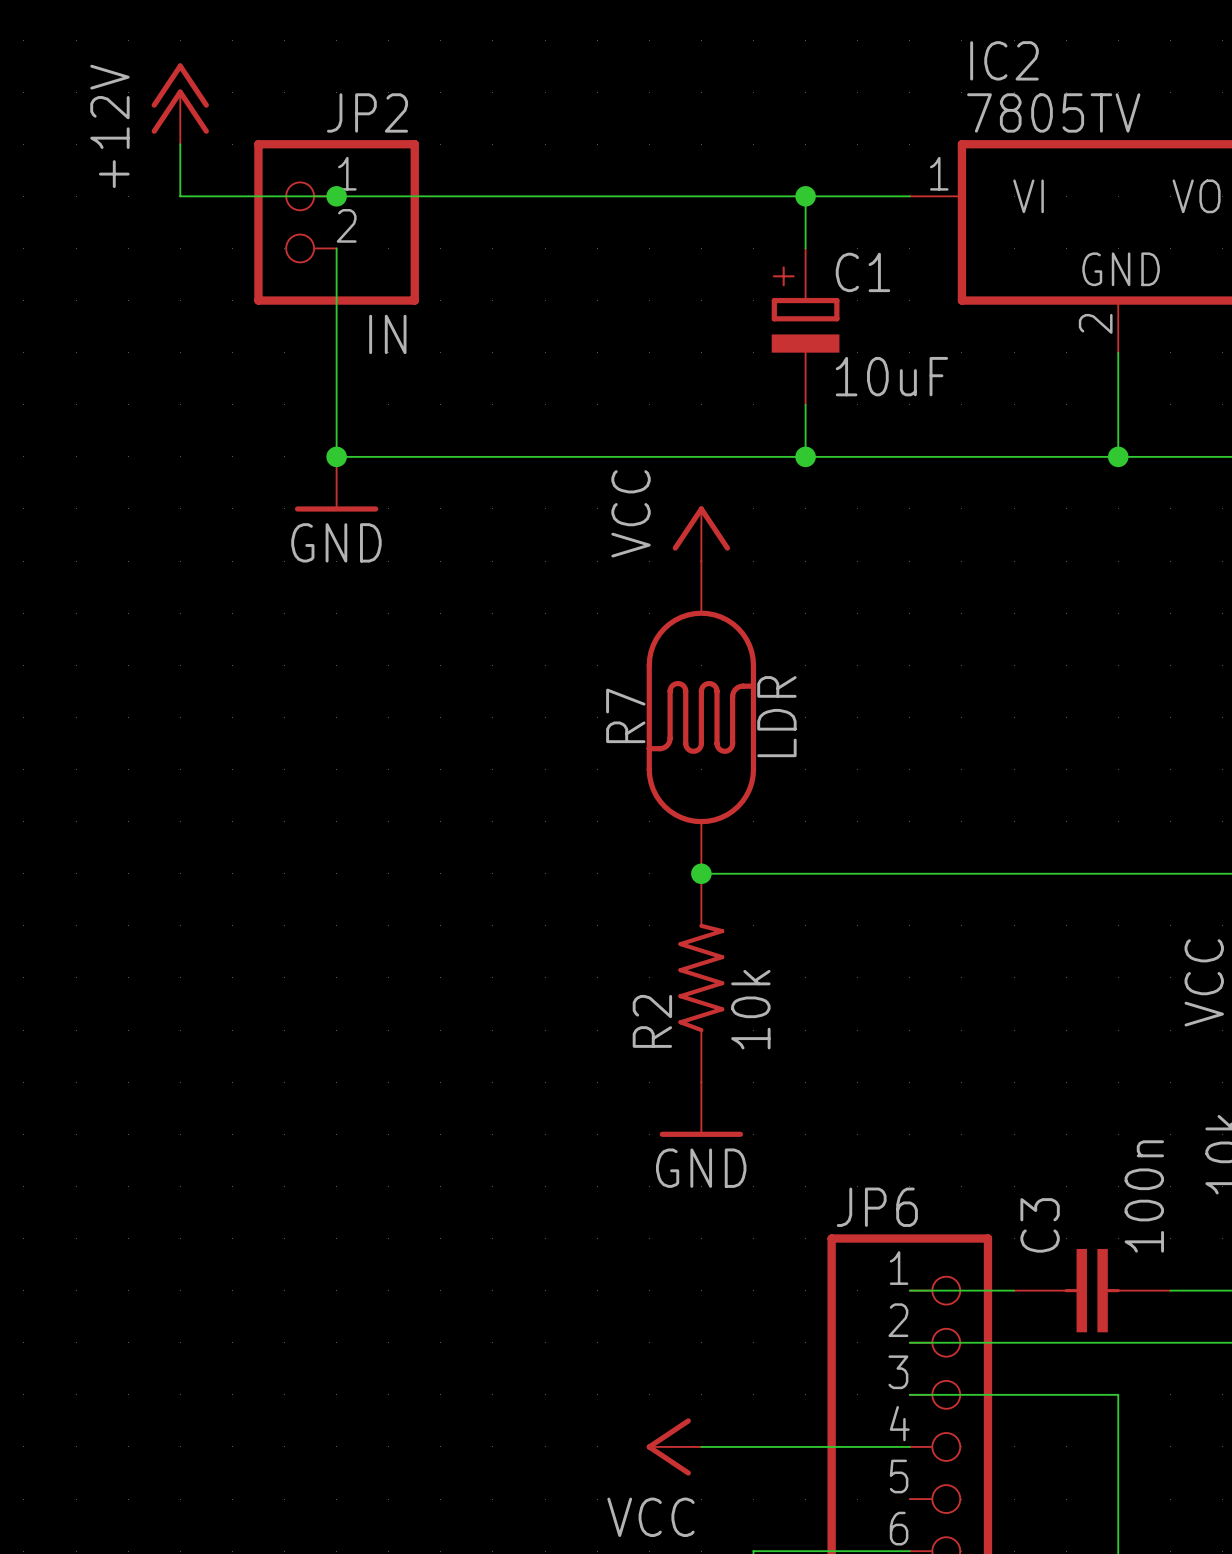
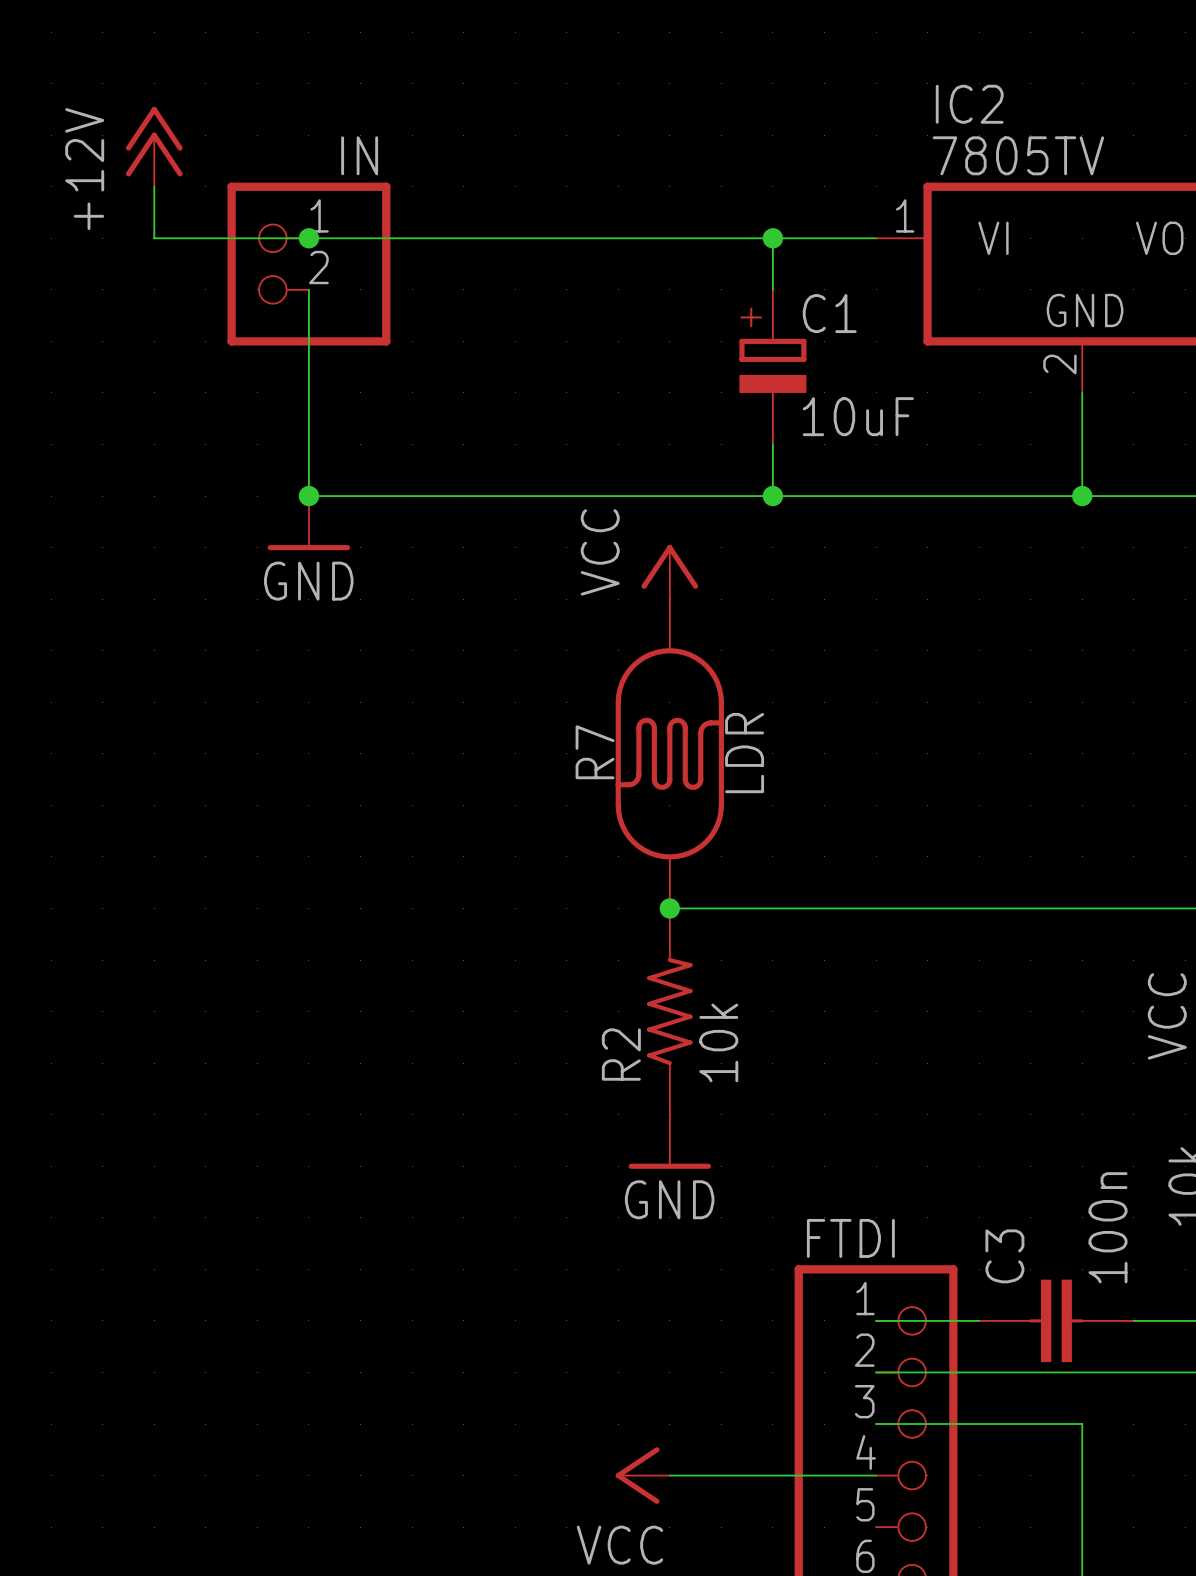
JP2 name: JP2 (367, 112) -> IN (359, 155)
JP2 value: IN (387, 334) -> none
JP6 name: JP6 (877, 1207) -> FTDI (850, 1238)

